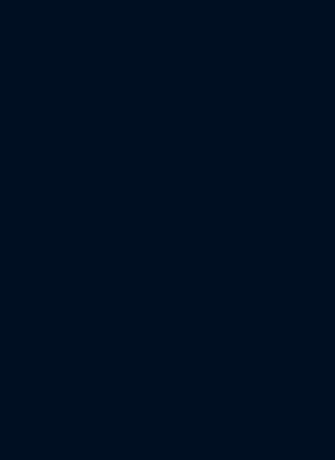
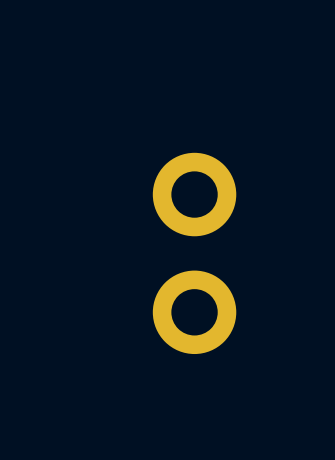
part: none -> (194, 253)

